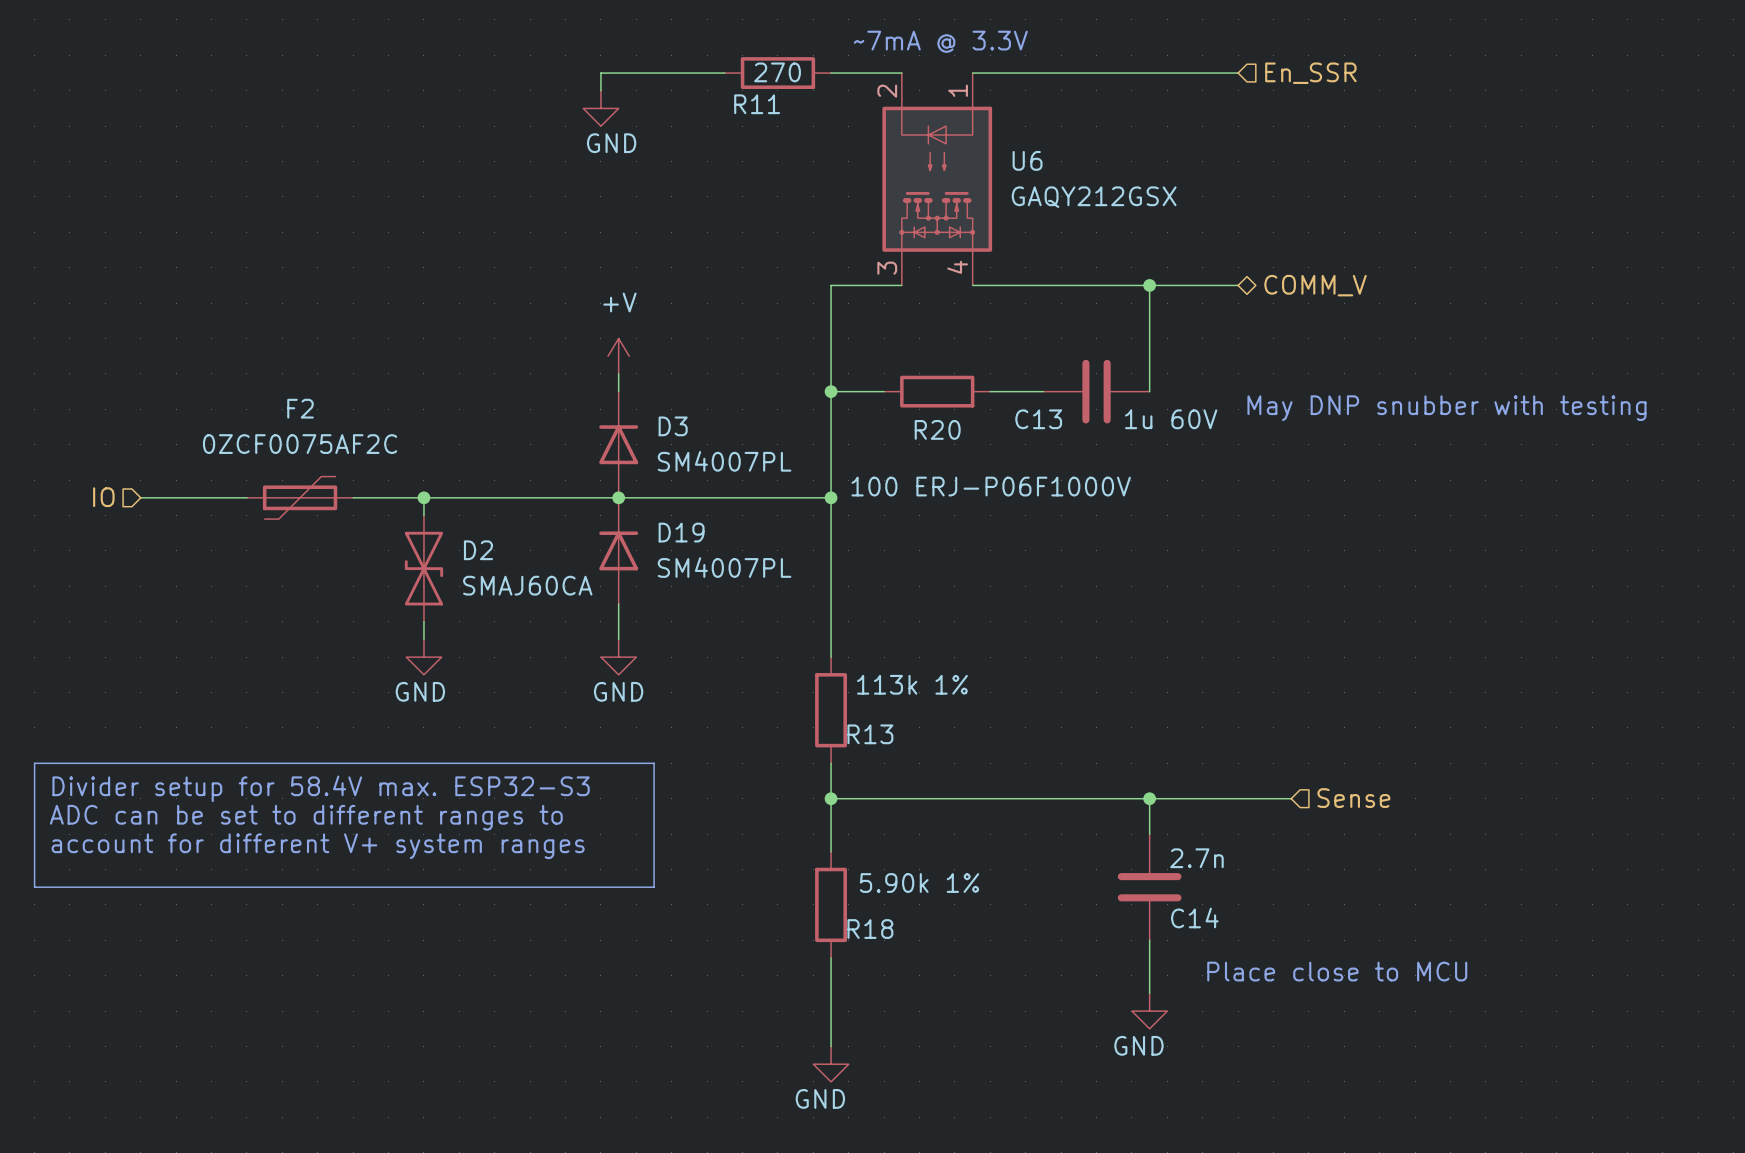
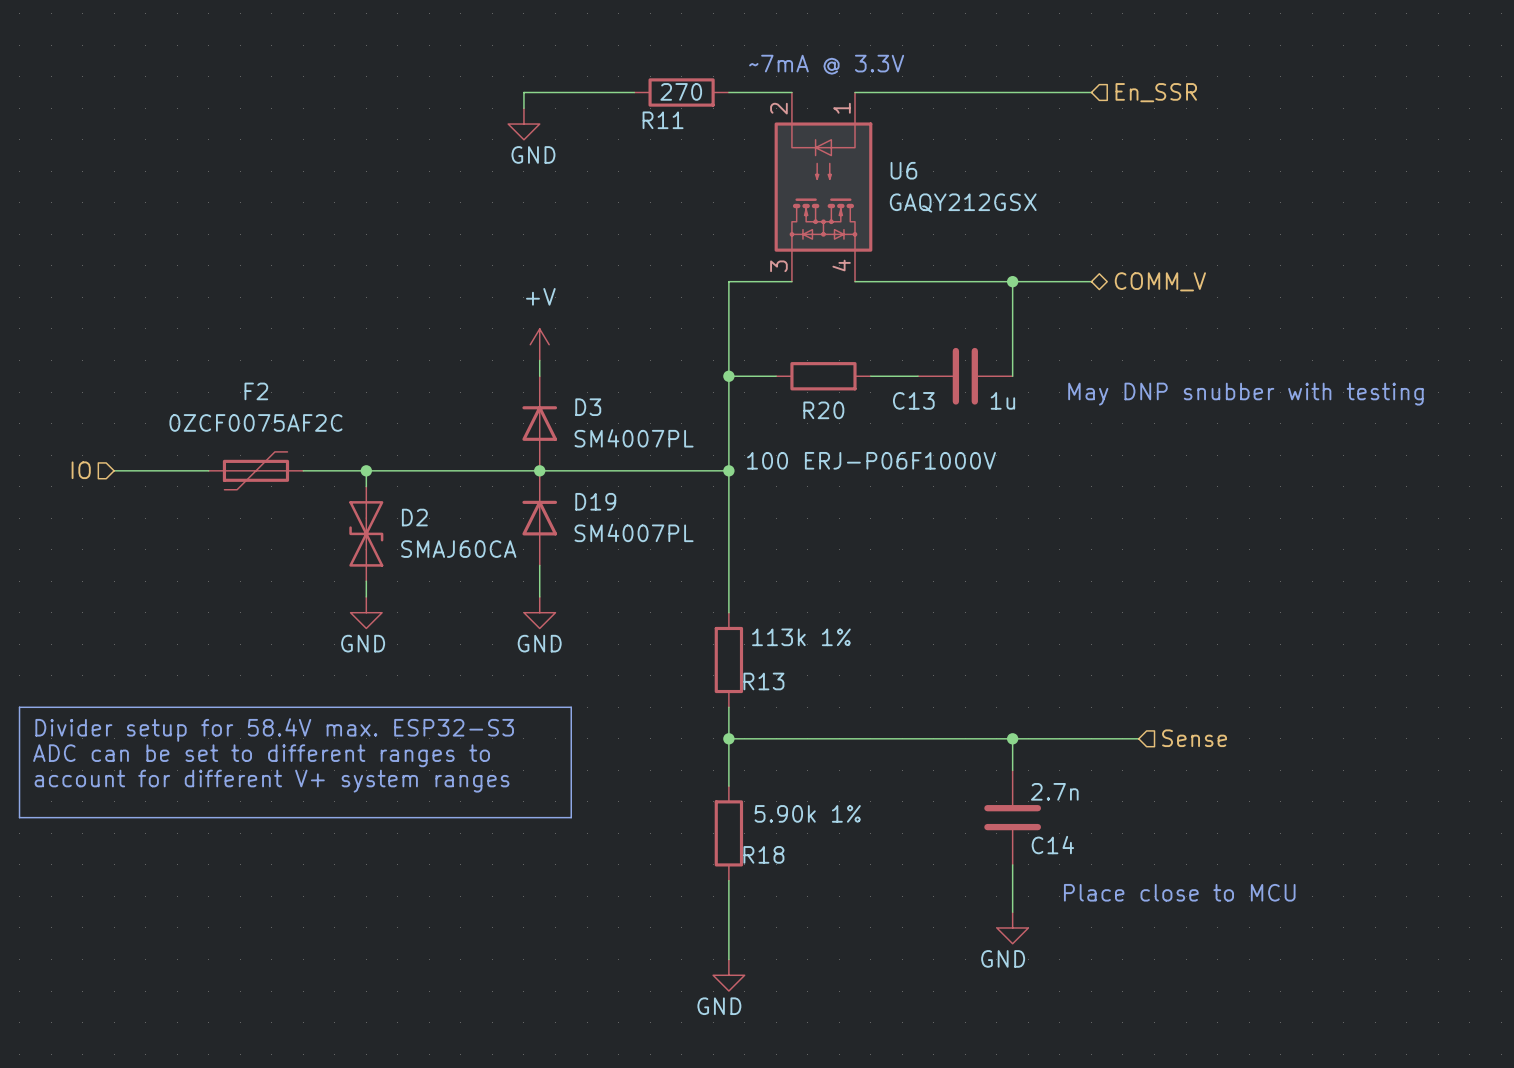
text position: May DNP snubber with testing (1446, 408) -> May DNP snubber with testing (1245, 394)
C13 value: 1u 60V (1171, 419) -> 1u (1002, 400)

